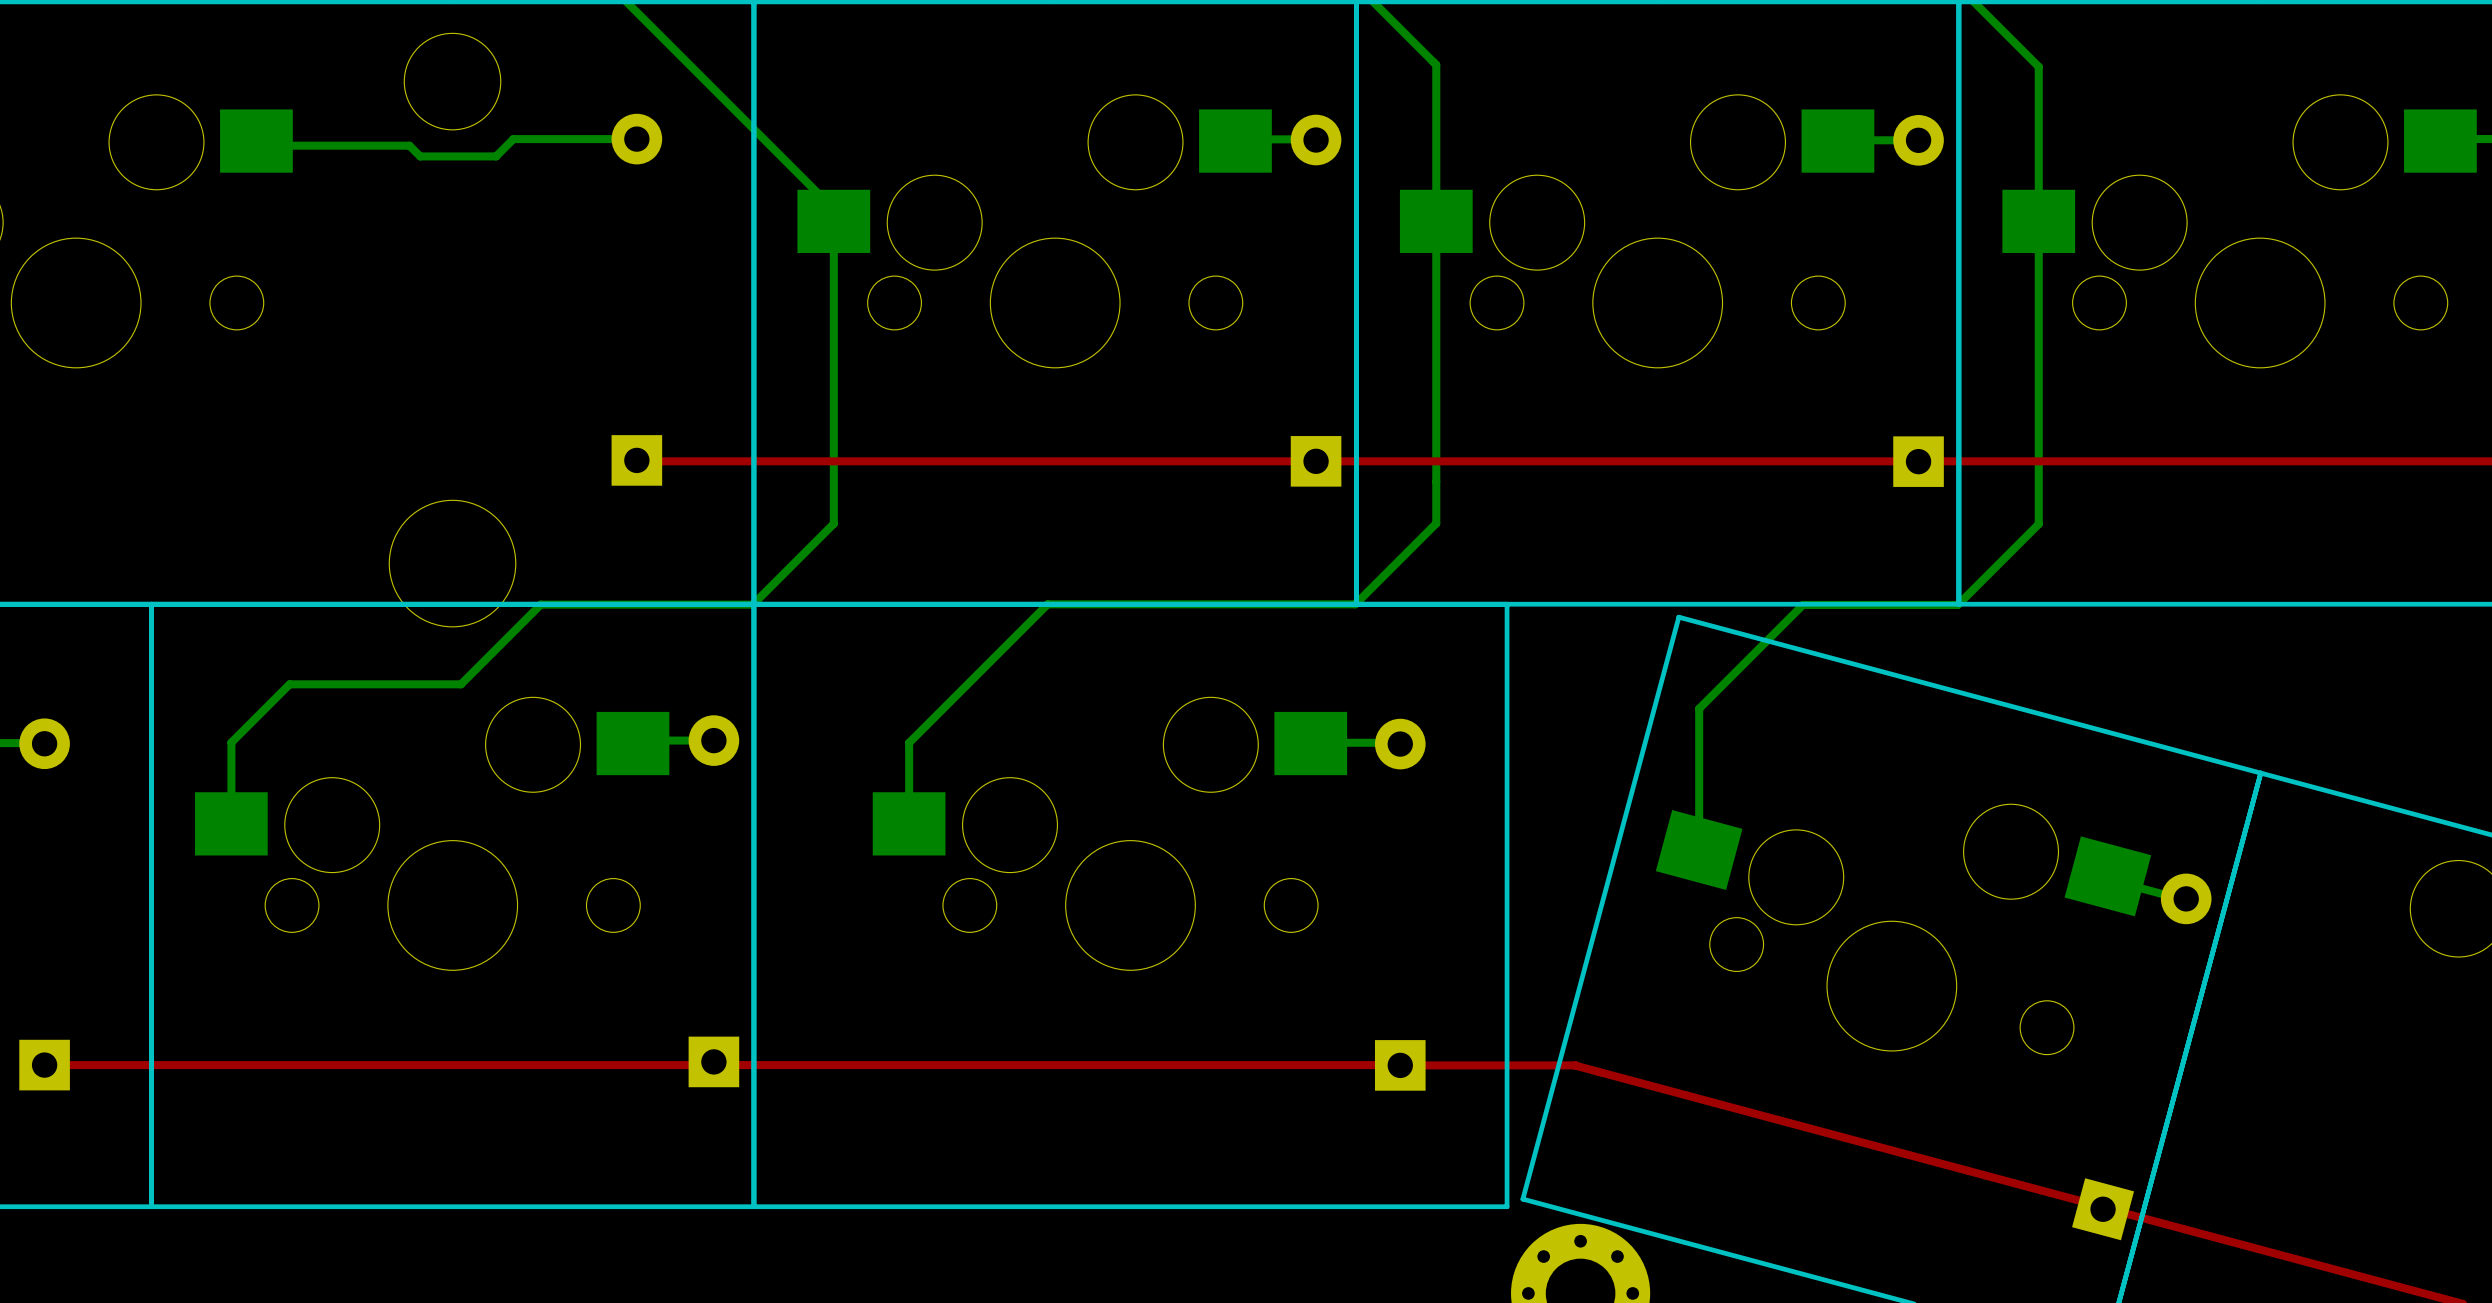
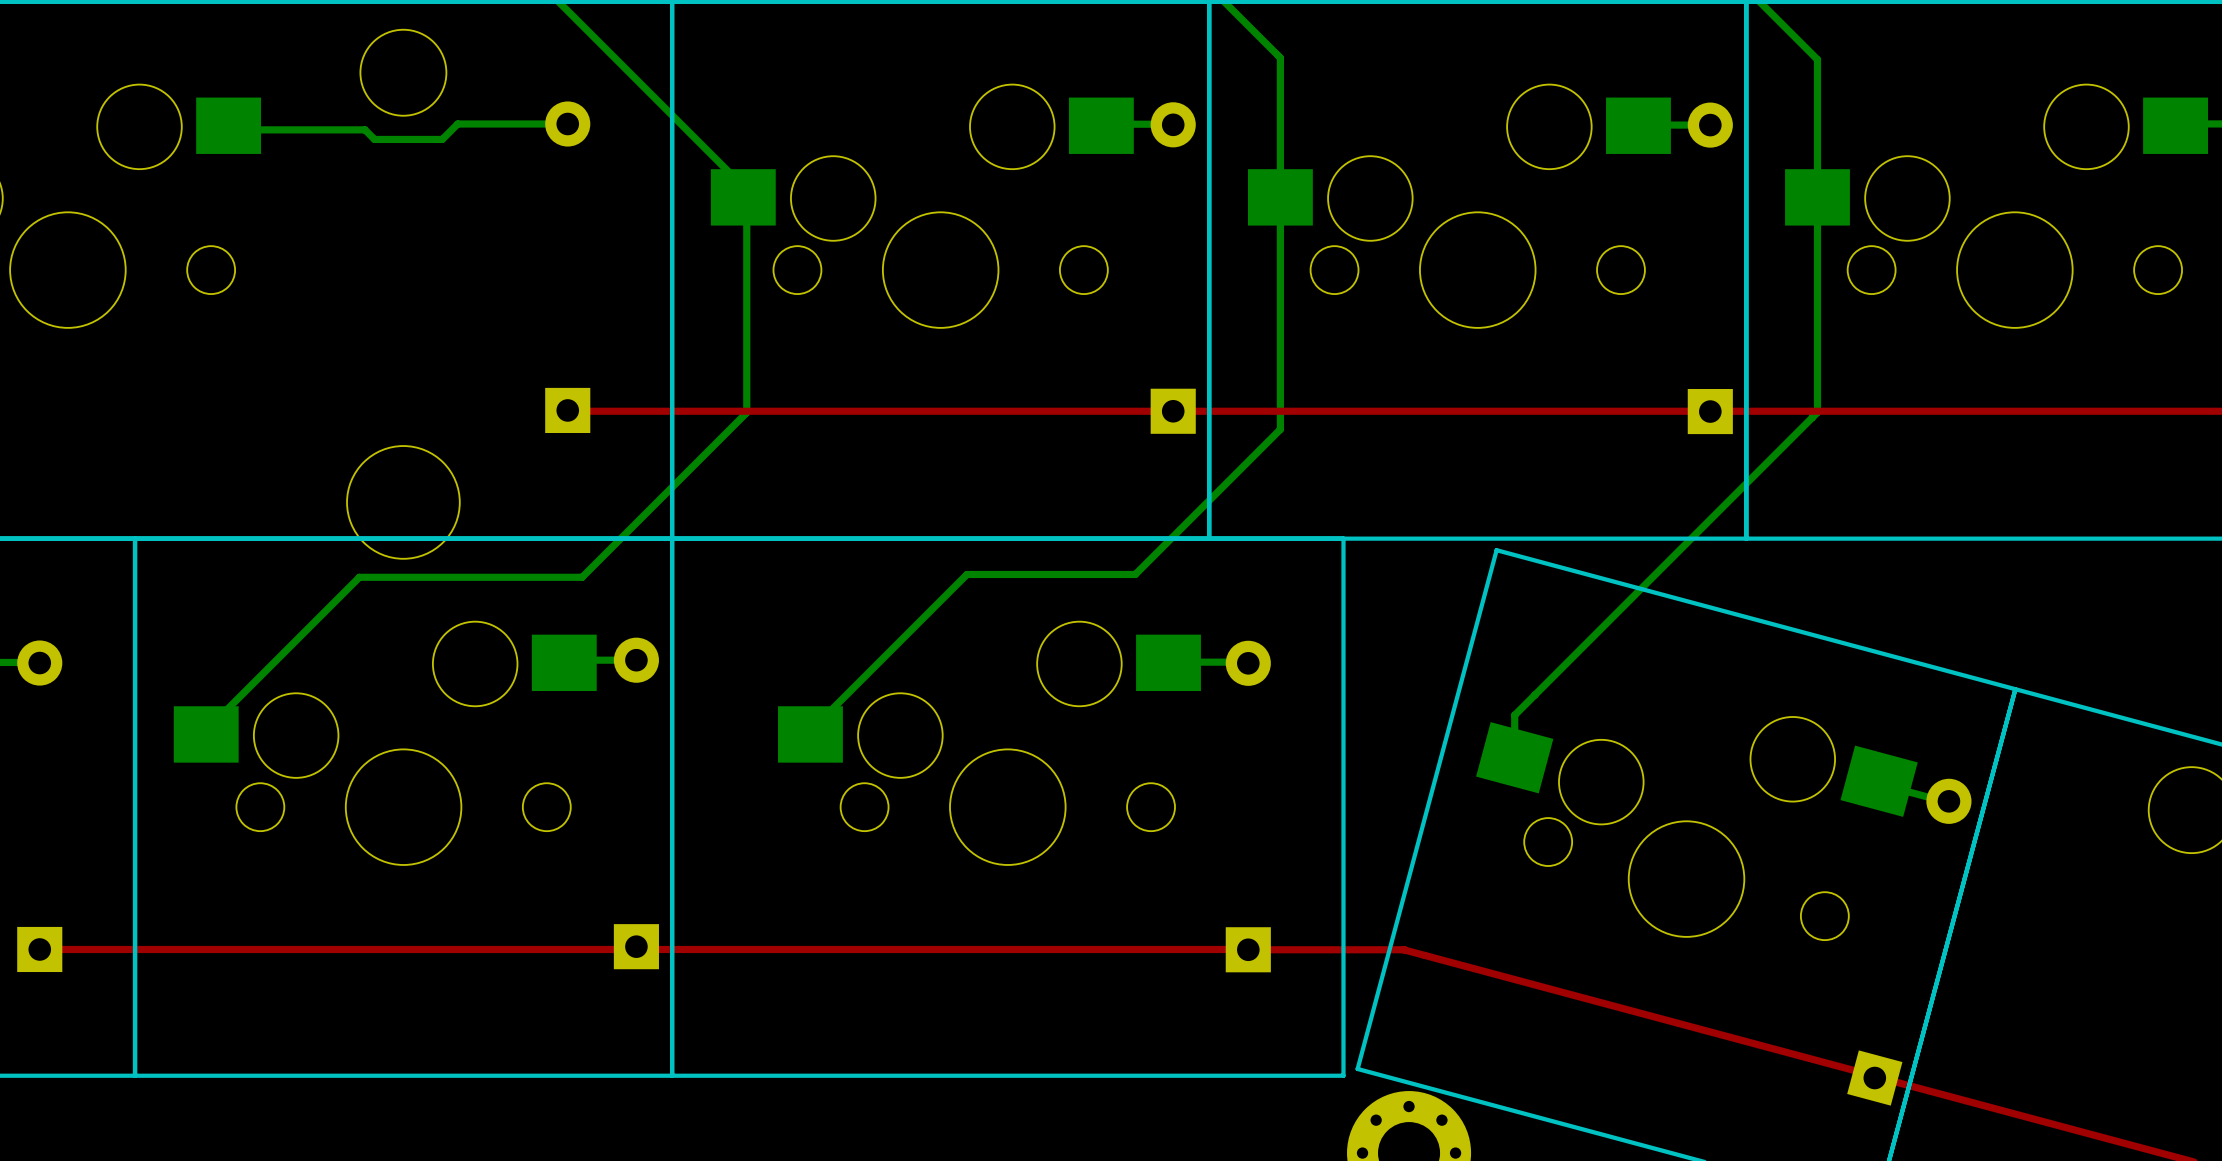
bottom track: none -> (746, 189) (746, 412) (582, 577) (359, 577) (209, 727)
bottom track: (833, 221) (833, 523) (752, 604) (540, 604) (461, 684) (289, 684) (231, 742) (231, 823) -> none
bottom track: (2038, 462) (2038, 524) (1957, 604) (1802, 604) (1699, 708) (1699, 802) -> (1817, 412) (1514, 715)
bottom track: (1436, 481) (1436, 523) (1355, 604) (1047, 604) (909, 742) (909, 824) -> (1280, 429) (1135, 574) (966, 574) (814, 727)

